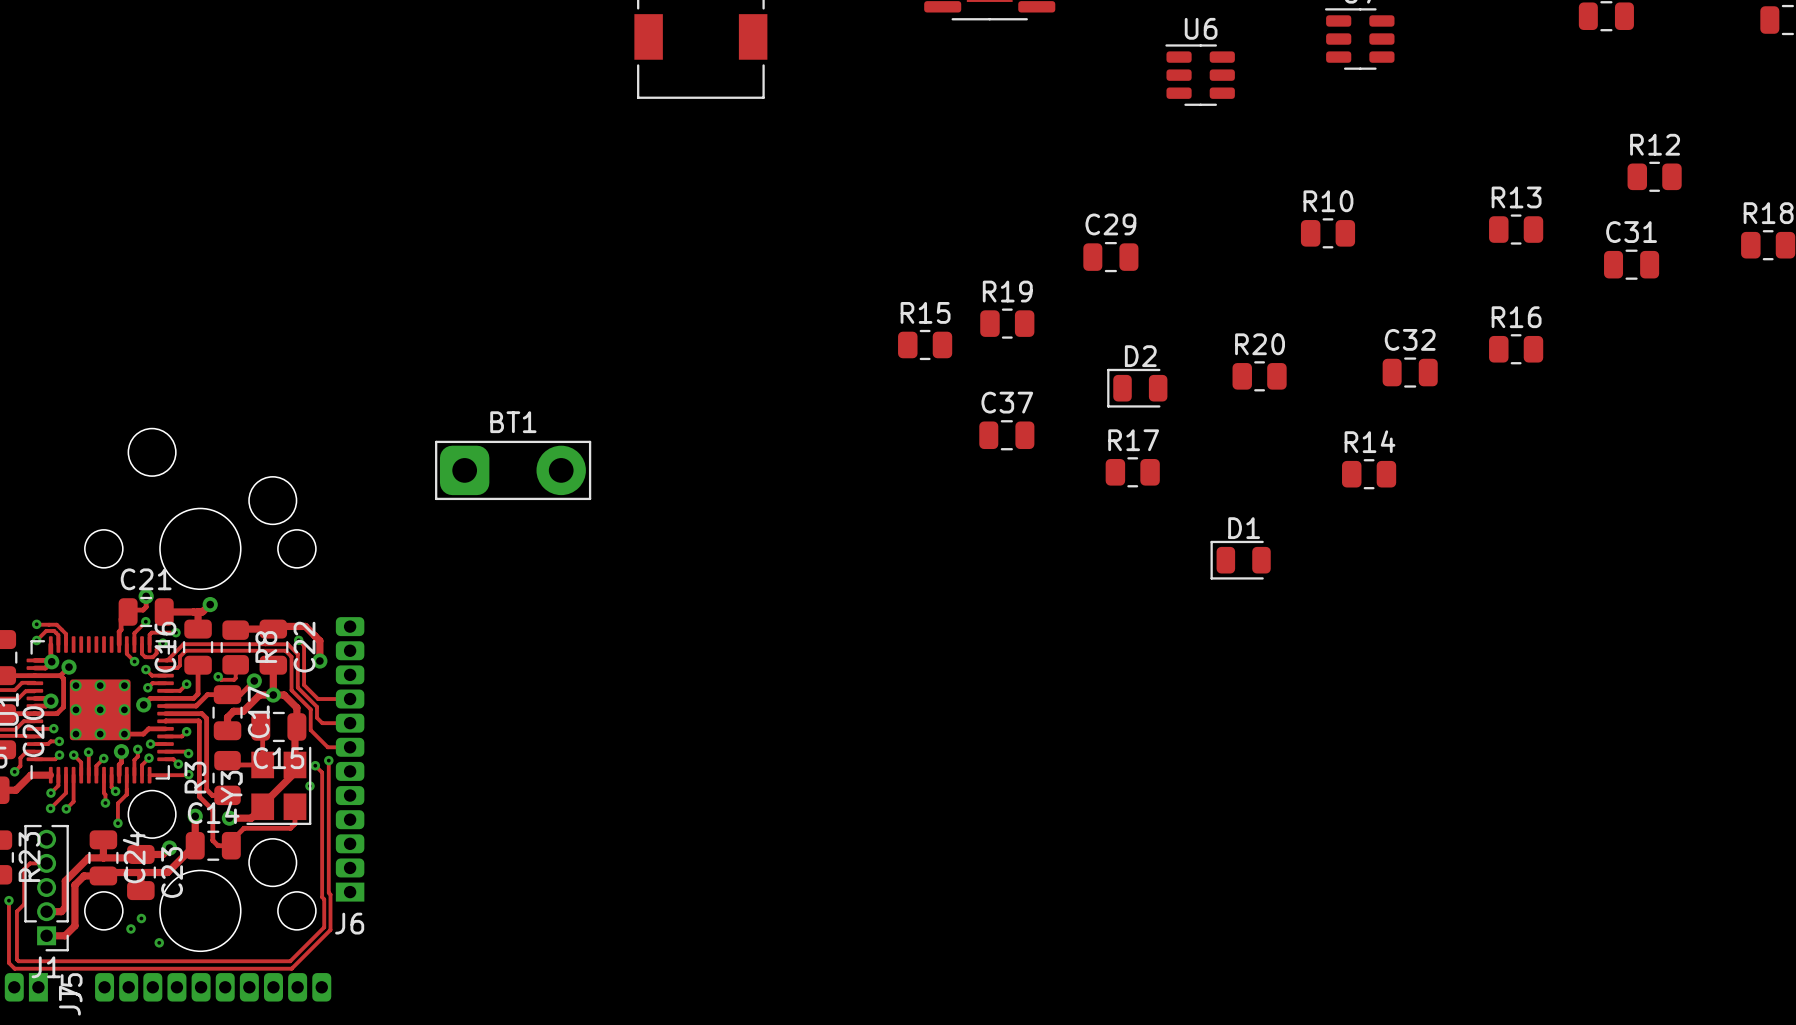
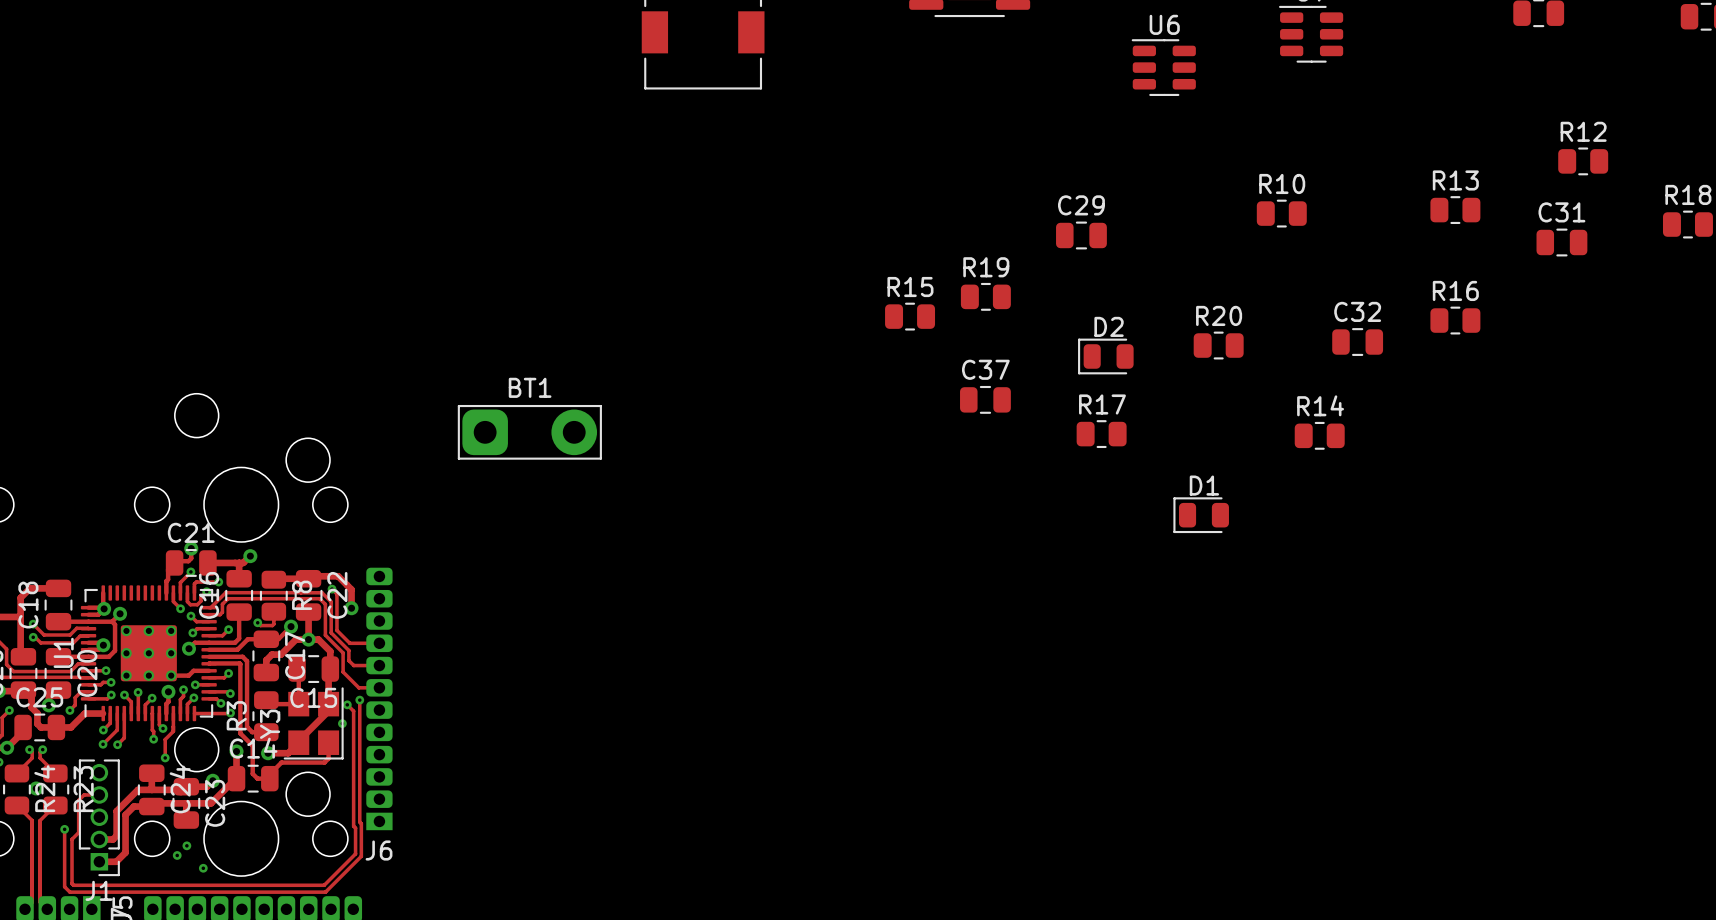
track: (36, 624) (56, 624) (65, 633) (65, 644) -> none
via: (36, 624) -> none
track: (36, 640) (46, 630) (54, 630) (58, 635) (58, 644) -> none
via: (36, 640) -> none

